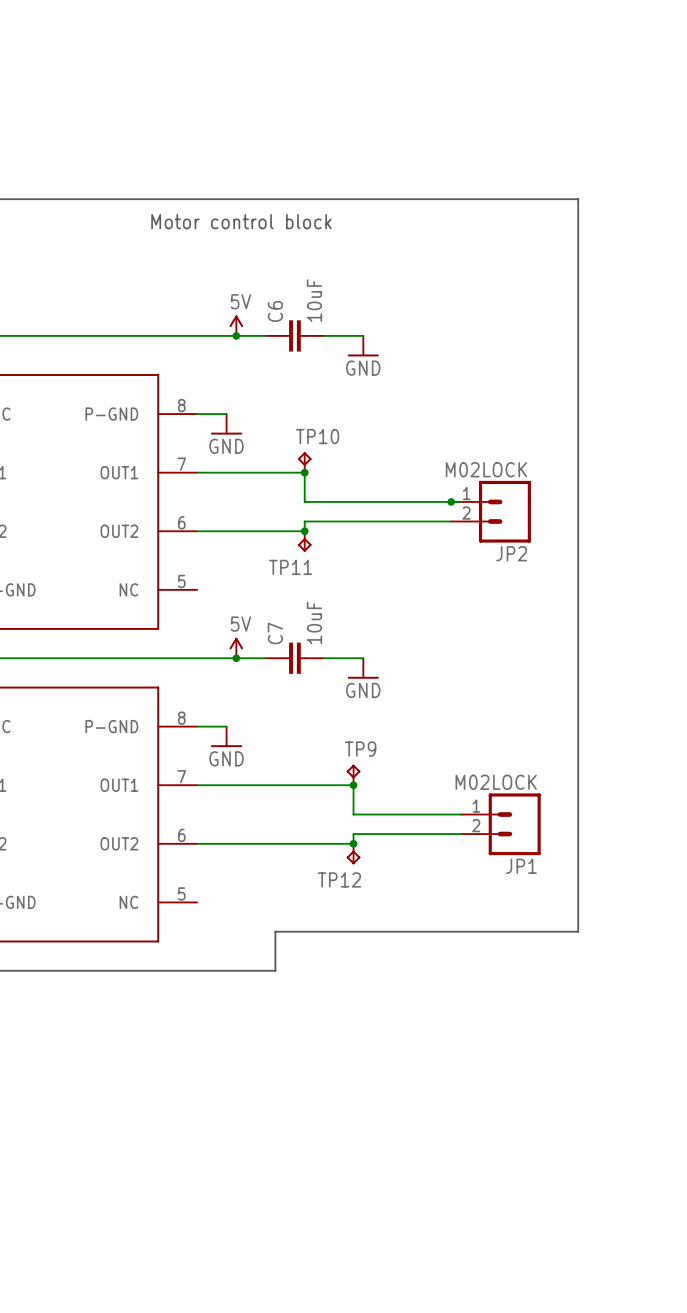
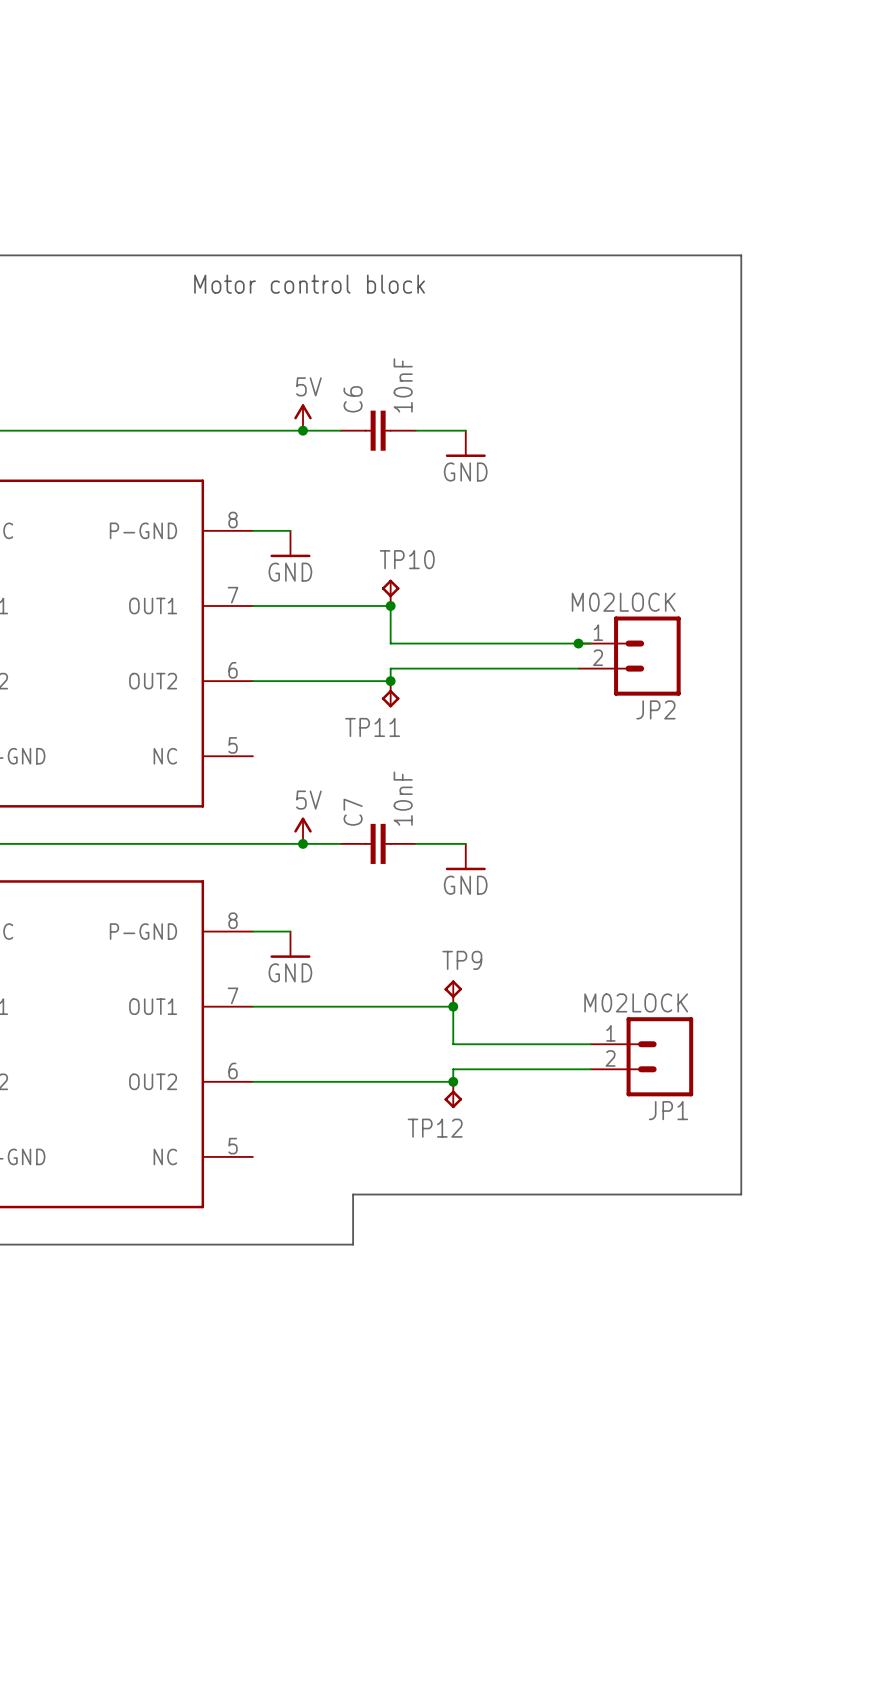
C6 value: 10uF (314, 300) -> 10nF (403, 385)
C7 value: 10uF (314, 622) -> 10nF (403, 798)

